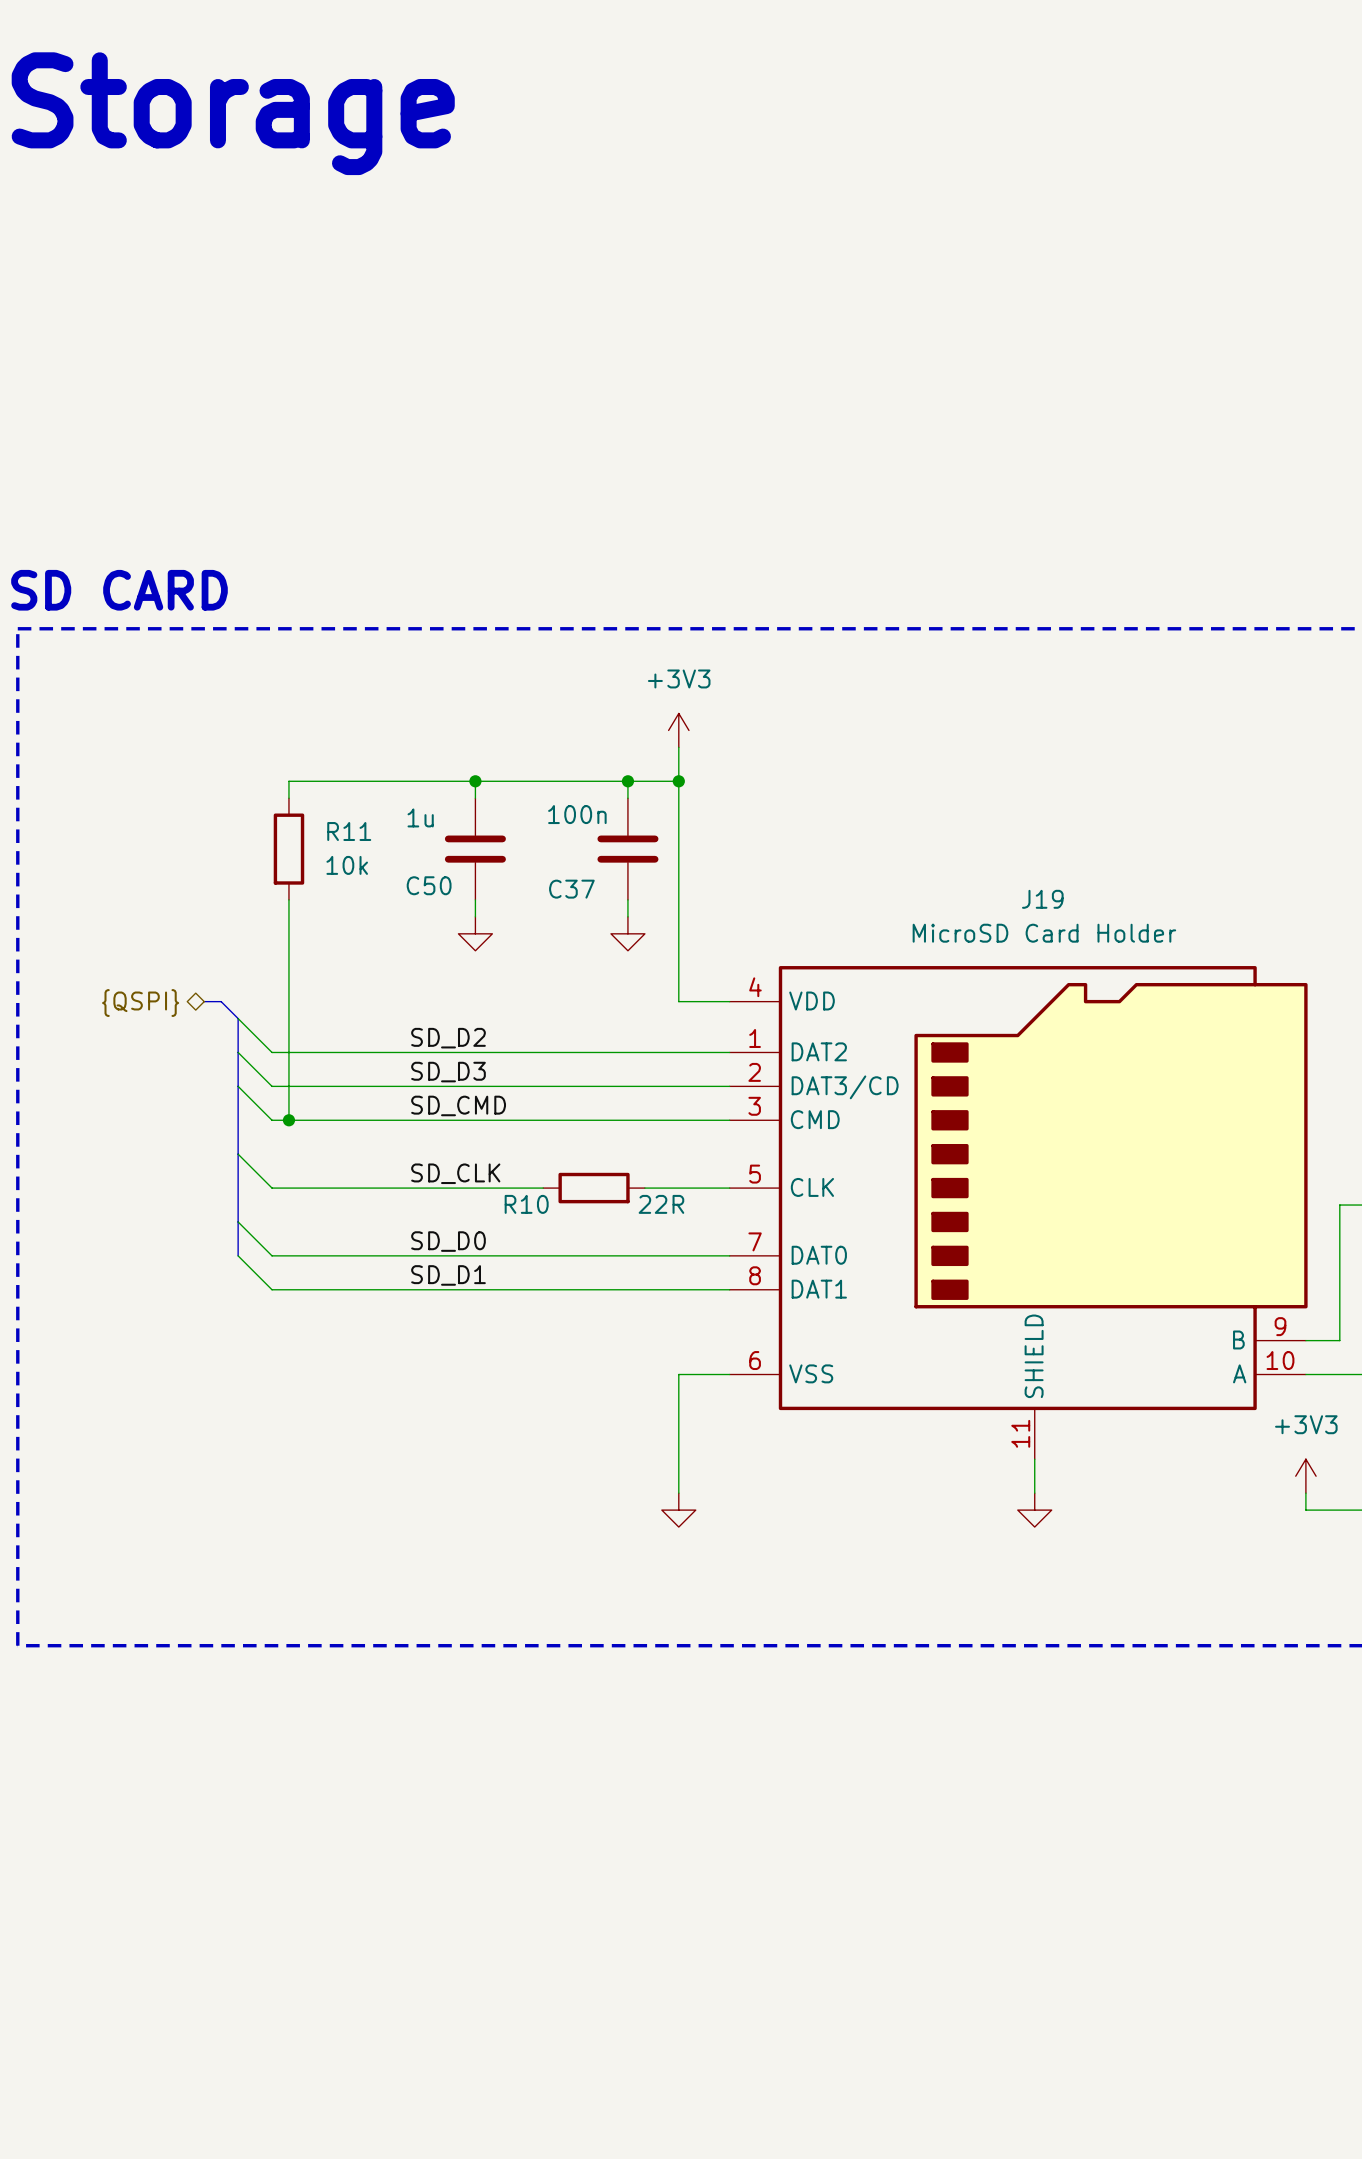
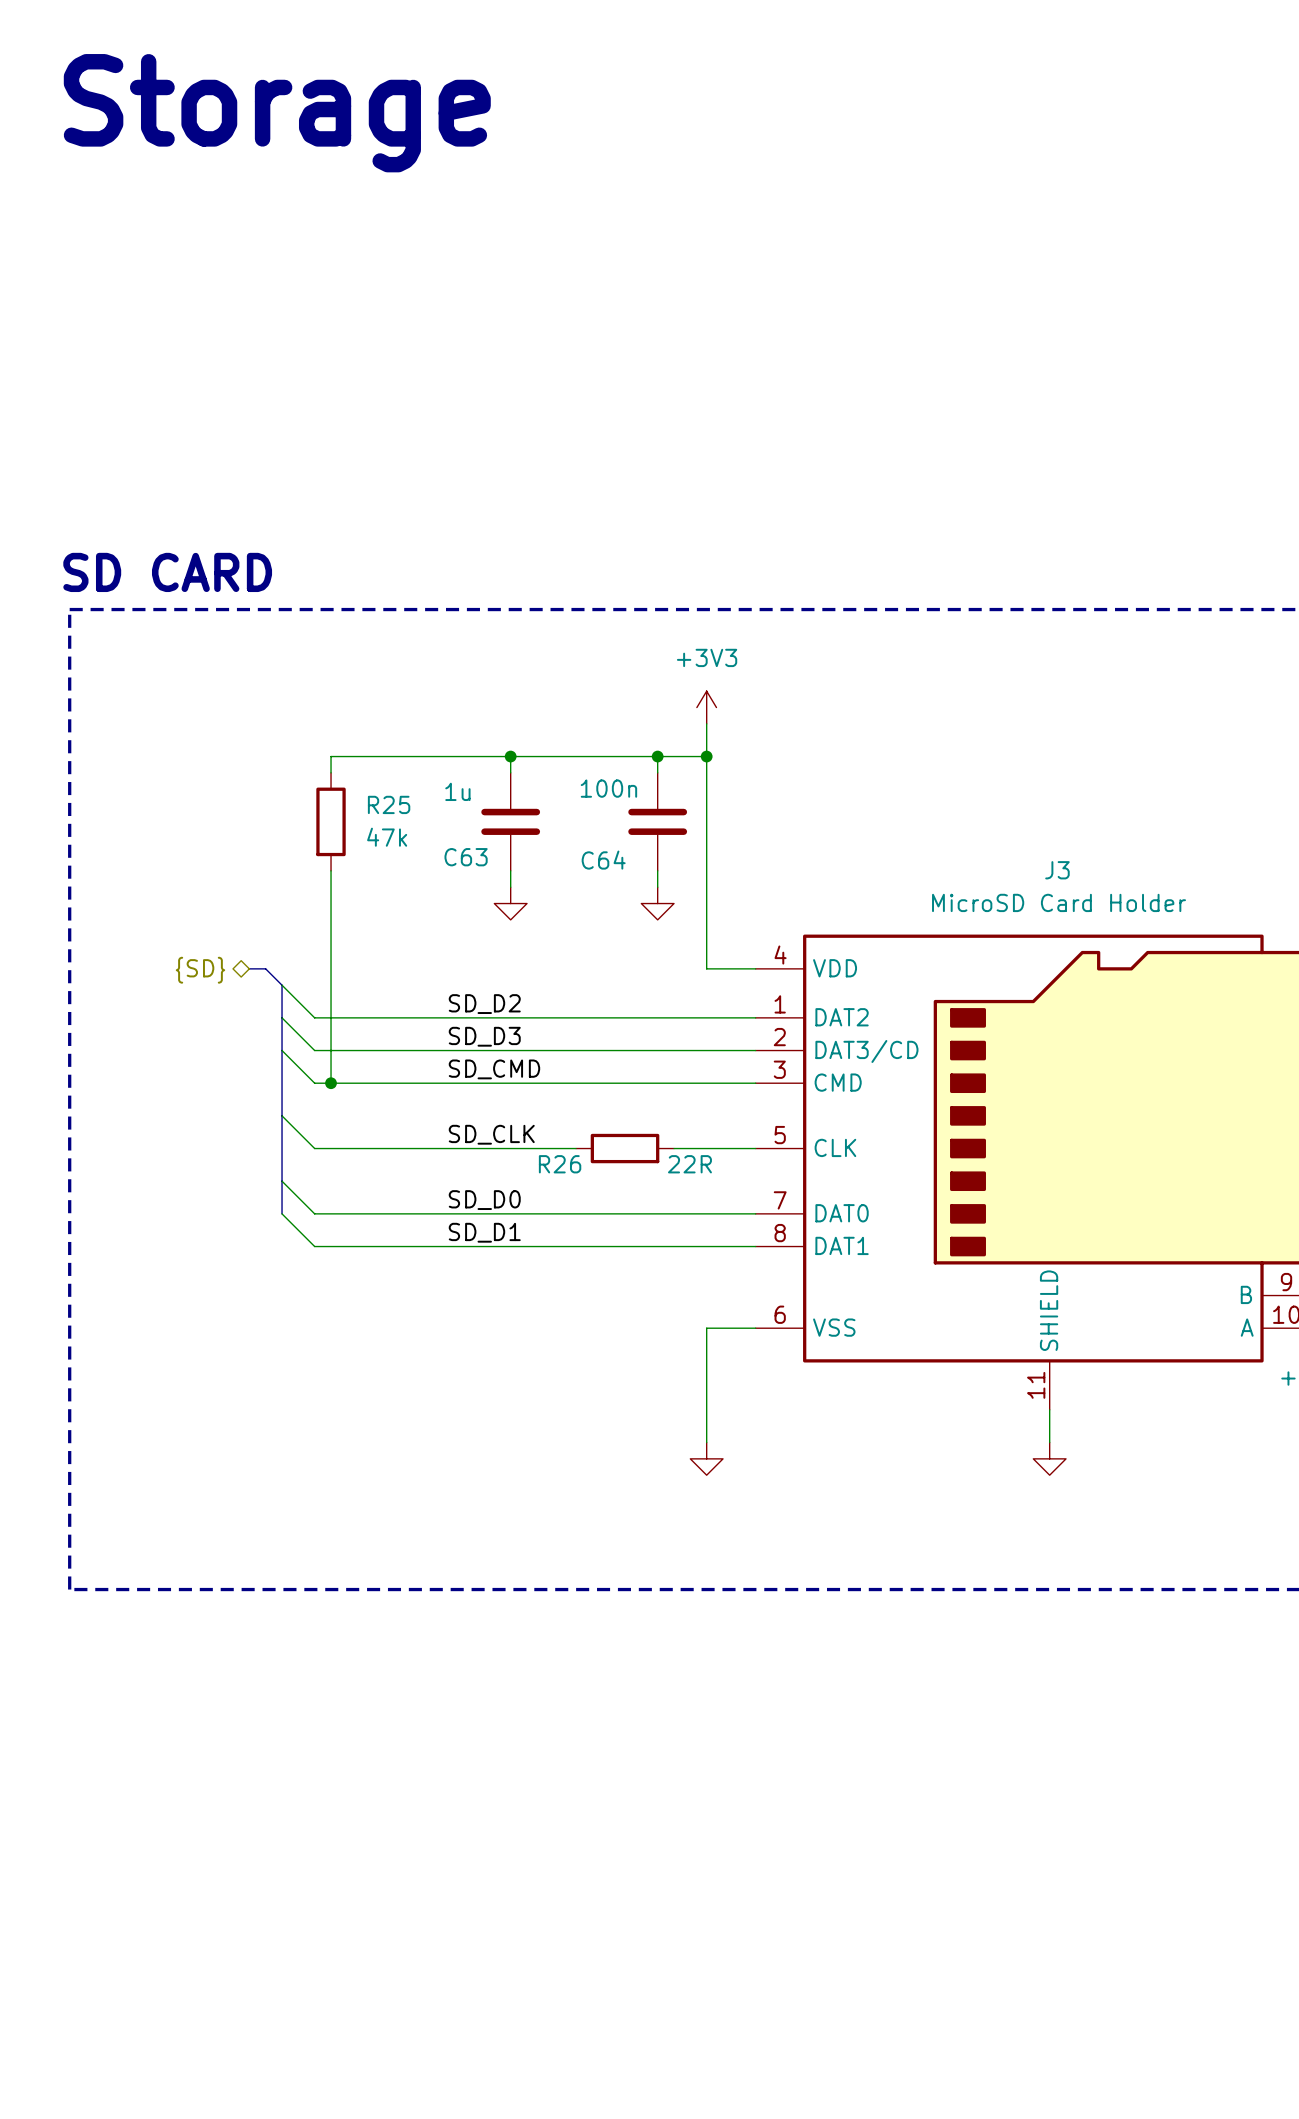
R11 name: R11 (349, 831) -> R25 (389, 804)
R11 value: 10k (347, 865) -> 47k (387, 837)
C50 name: C50 (429, 885) -> C63 (466, 857)
C37 name: C37 (571, 889) -> C64 (603, 860)
J19 name: J19 (1042, 899) -> J3 (1057, 870)
hierarchical label: {QSPI} (140, 1003) -> {SD} (200, 970)
R10 name: R10 (526, 1204) -> R26 (560, 1164)

